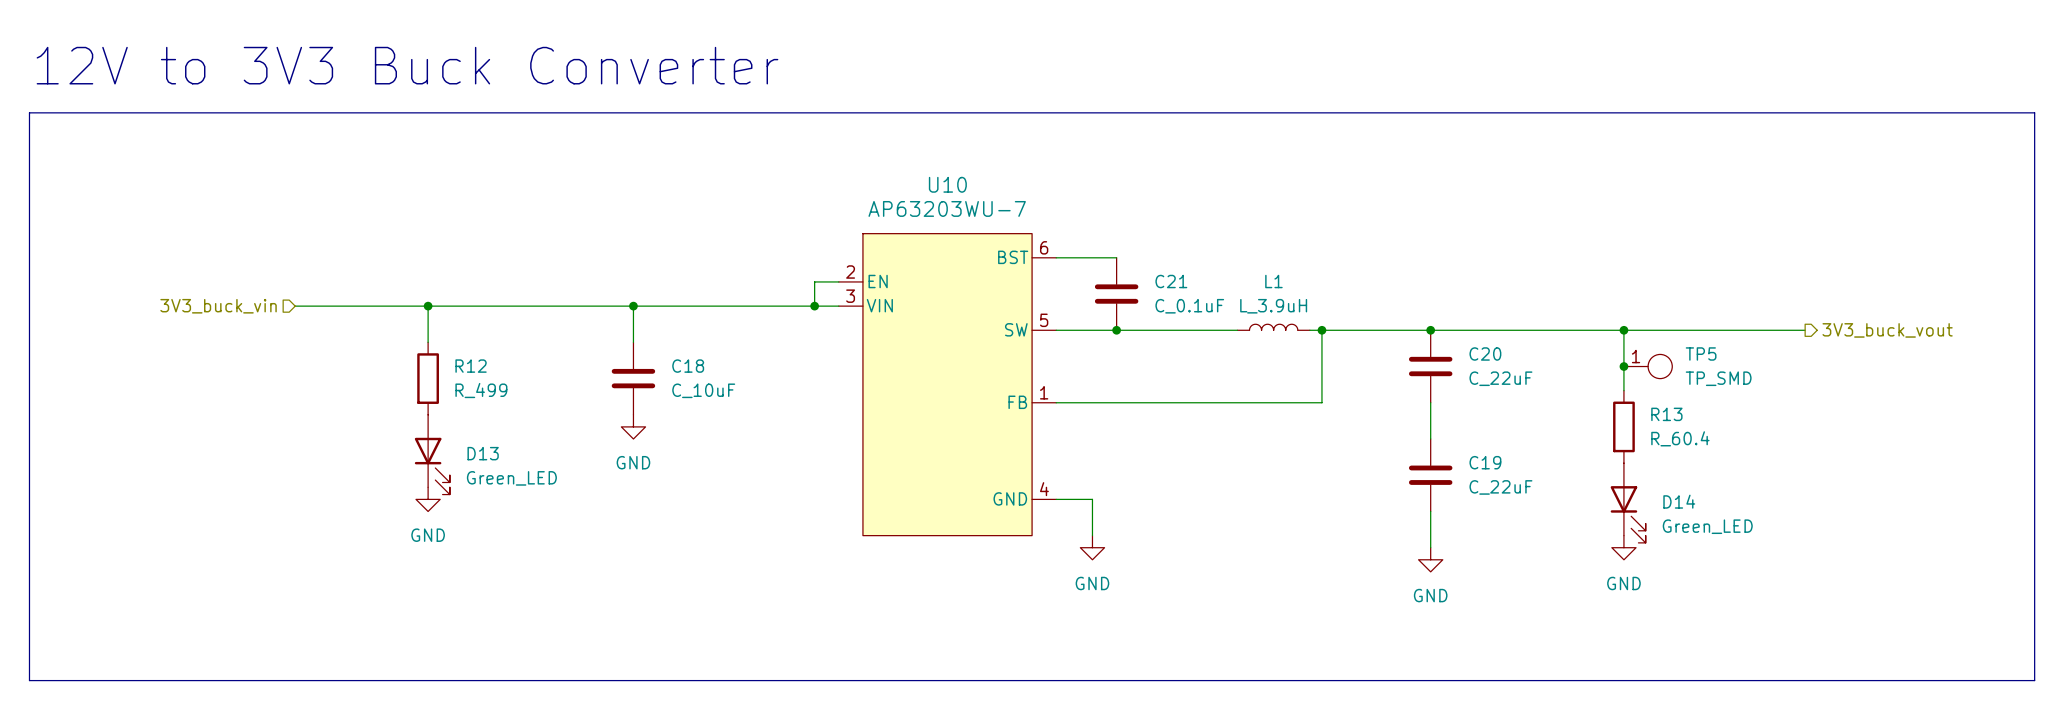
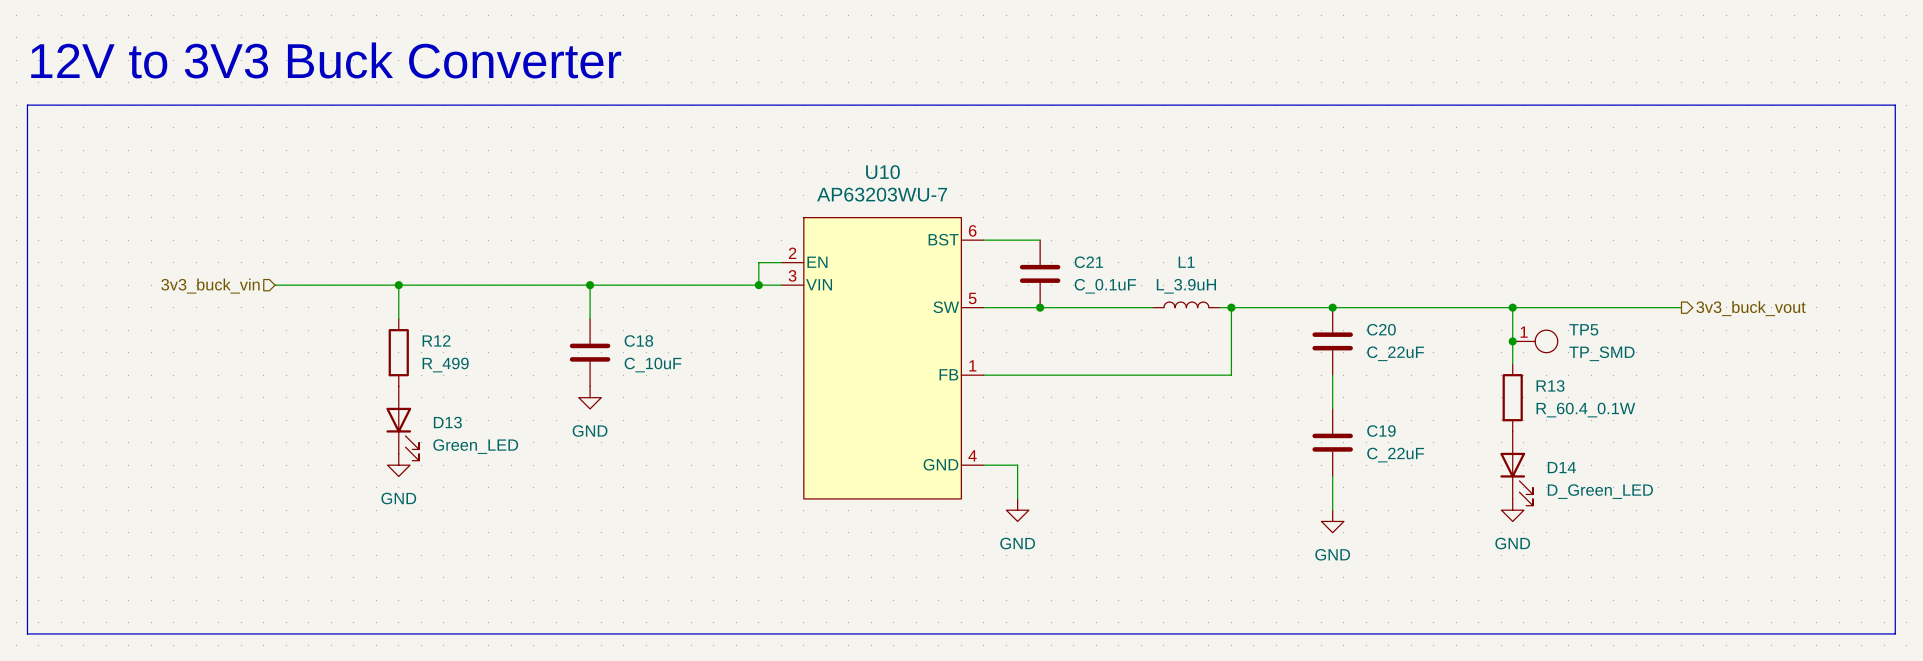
hierarchical label: 3V3_buck_vin (218, 306) -> 3v3_buck_vin (210, 286)
hierarchical label: 3V3_buck_vout (1887, 330) -> 3v3_buck_vout (1751, 308)
R13 value: R_60.4 (1680, 438) -> R_60.4_0.1W (1585, 410)
D14 value: Green_LED (1707, 526) -> D_Green_LED (1600, 491)

